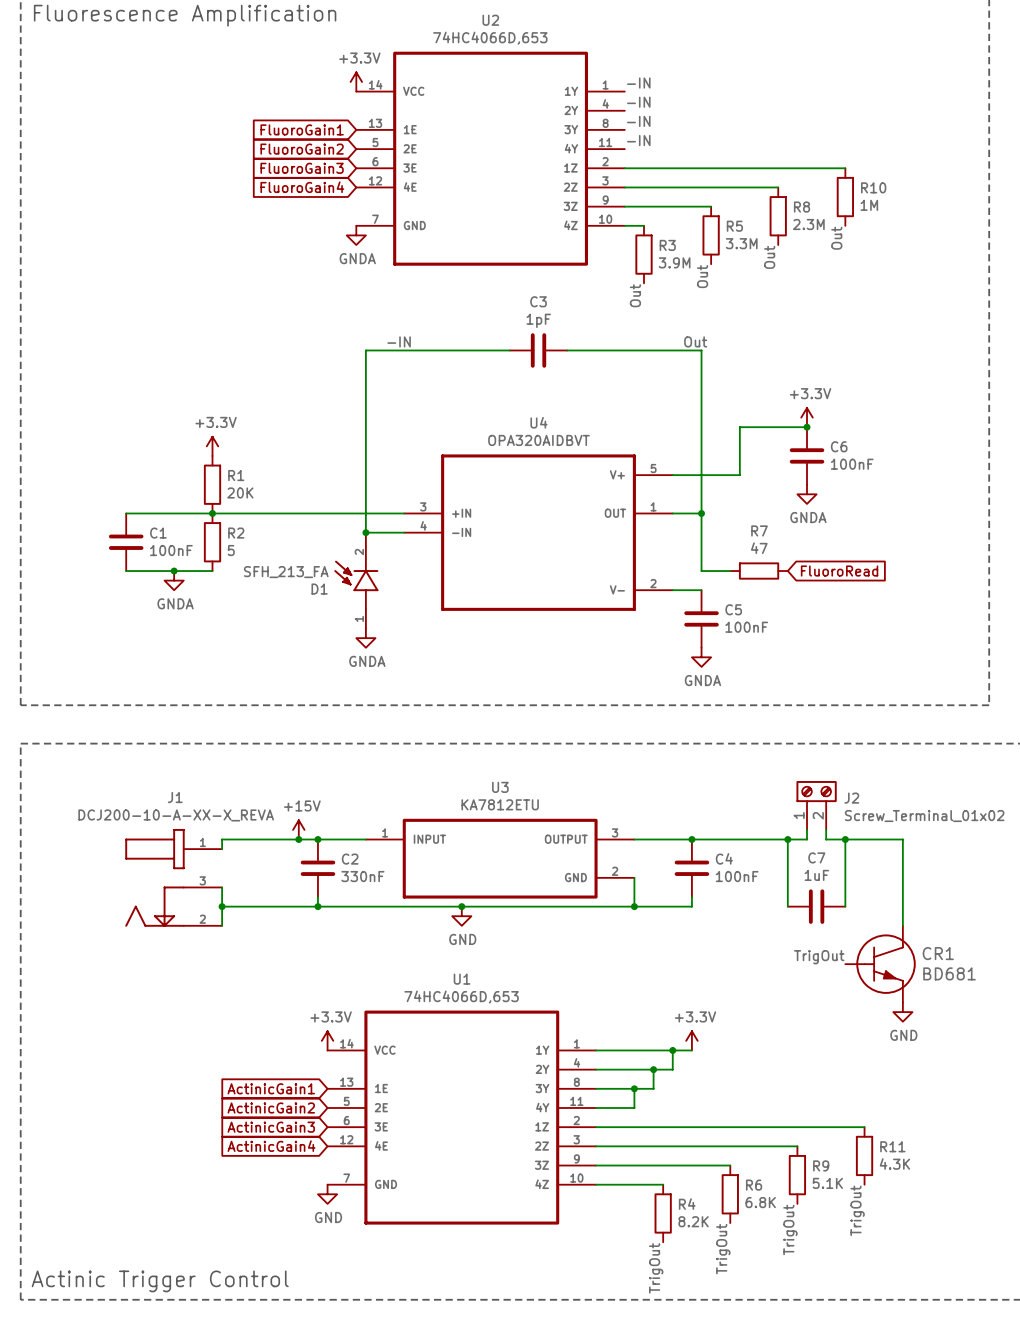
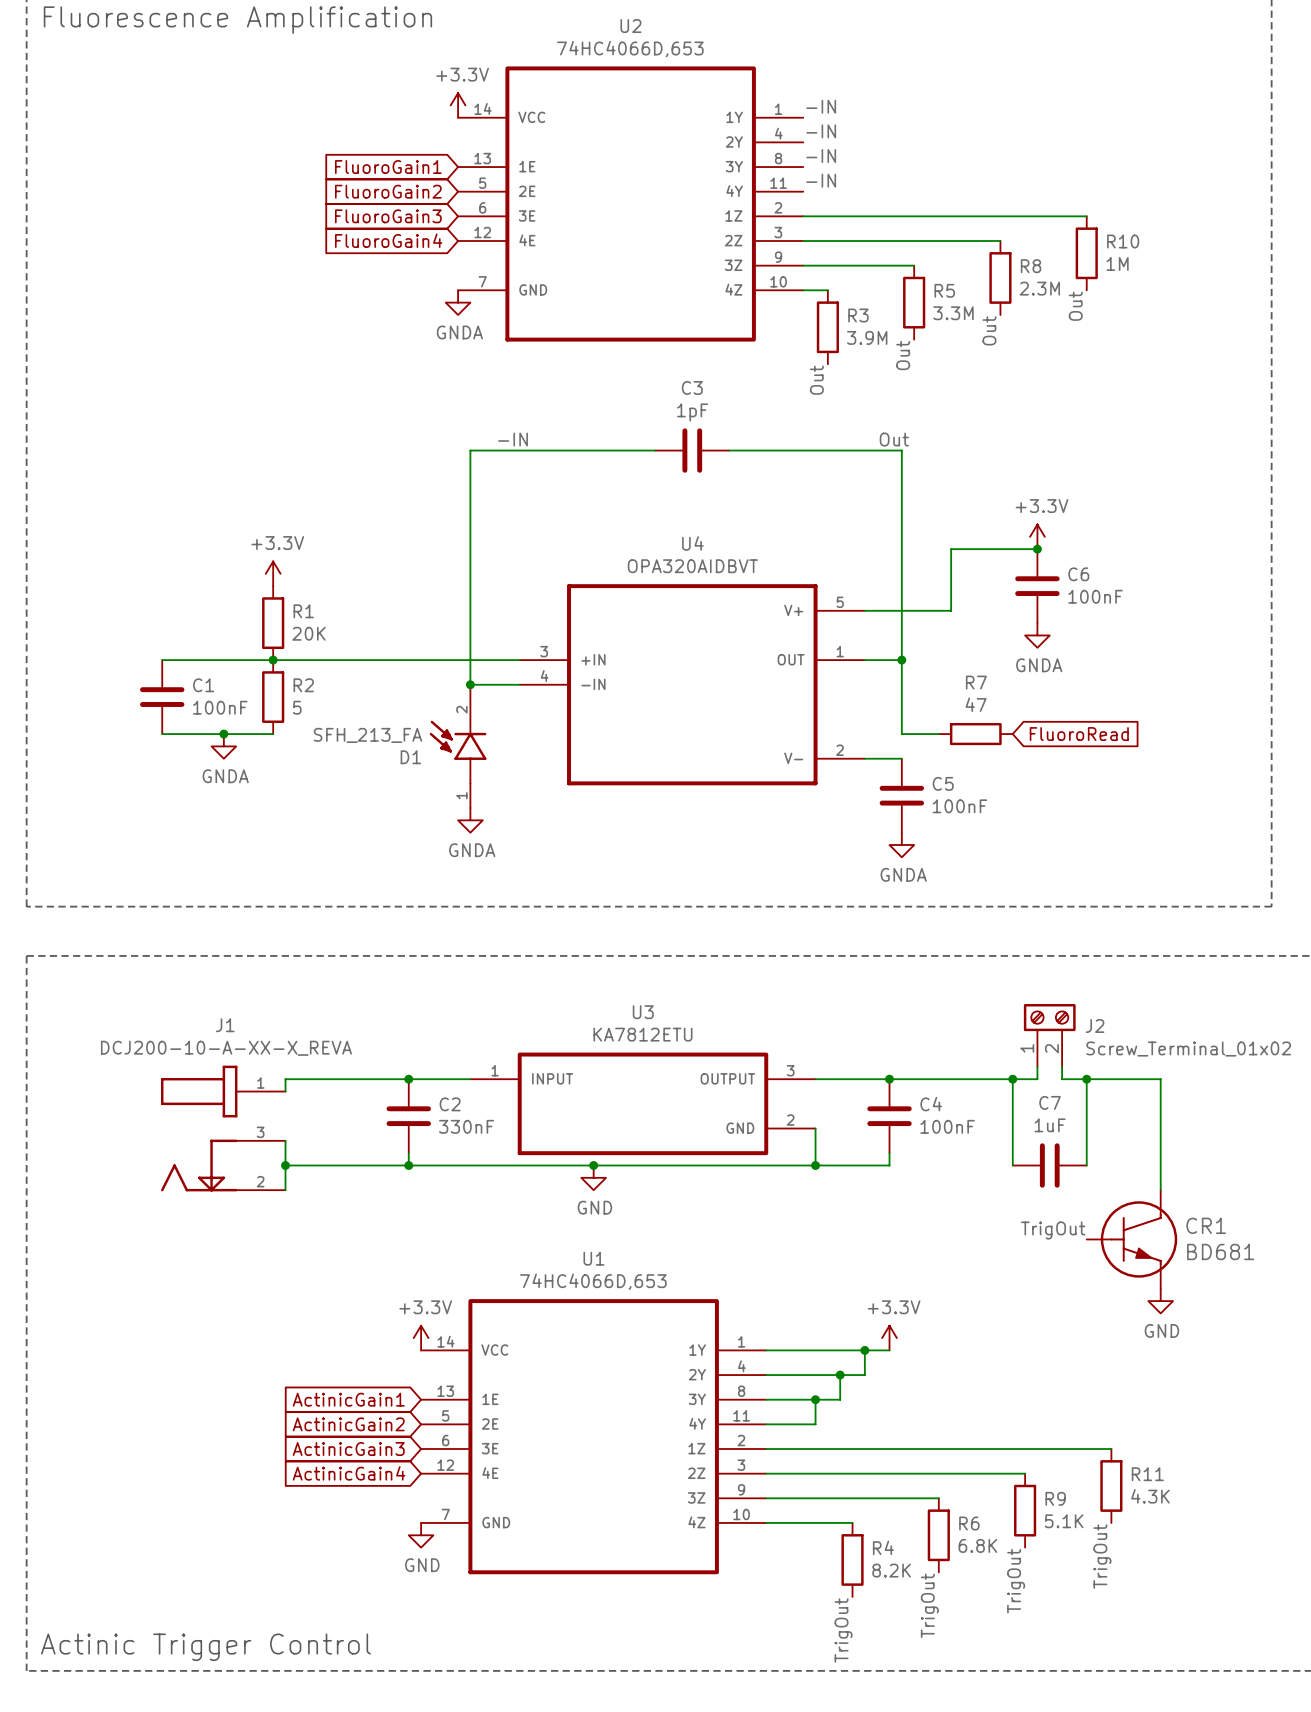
power symbol: +15V (298, 829) -> none
junction: (298, 839) -> none

